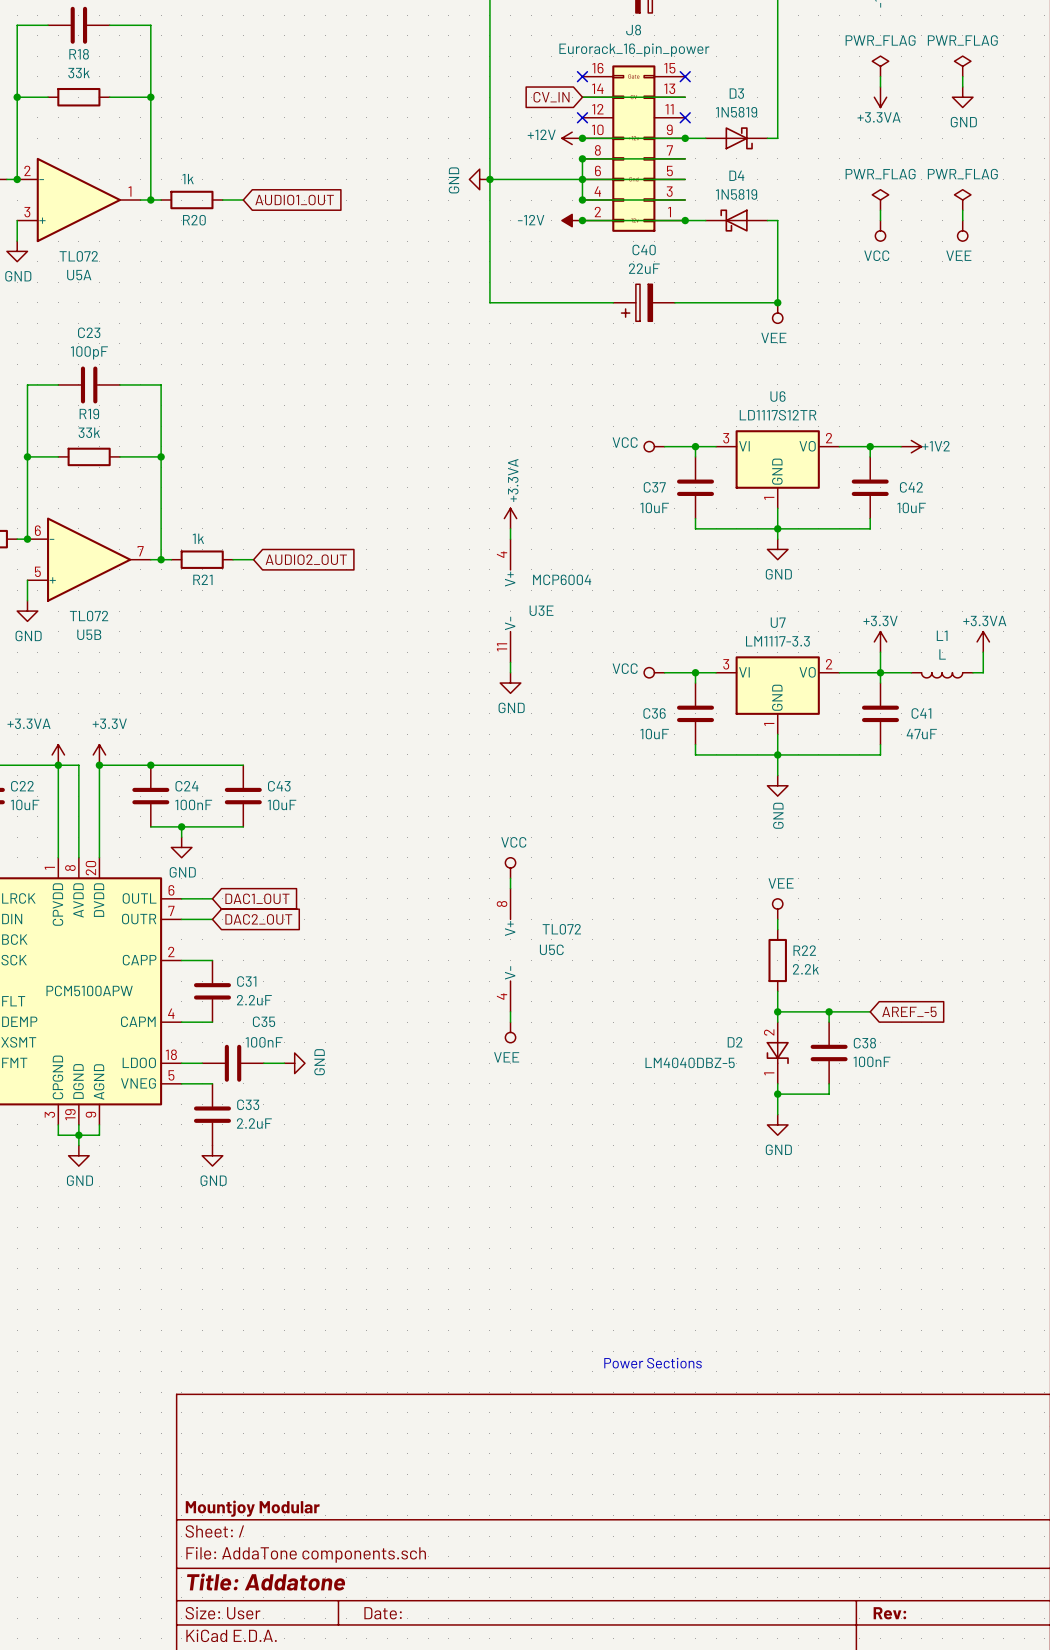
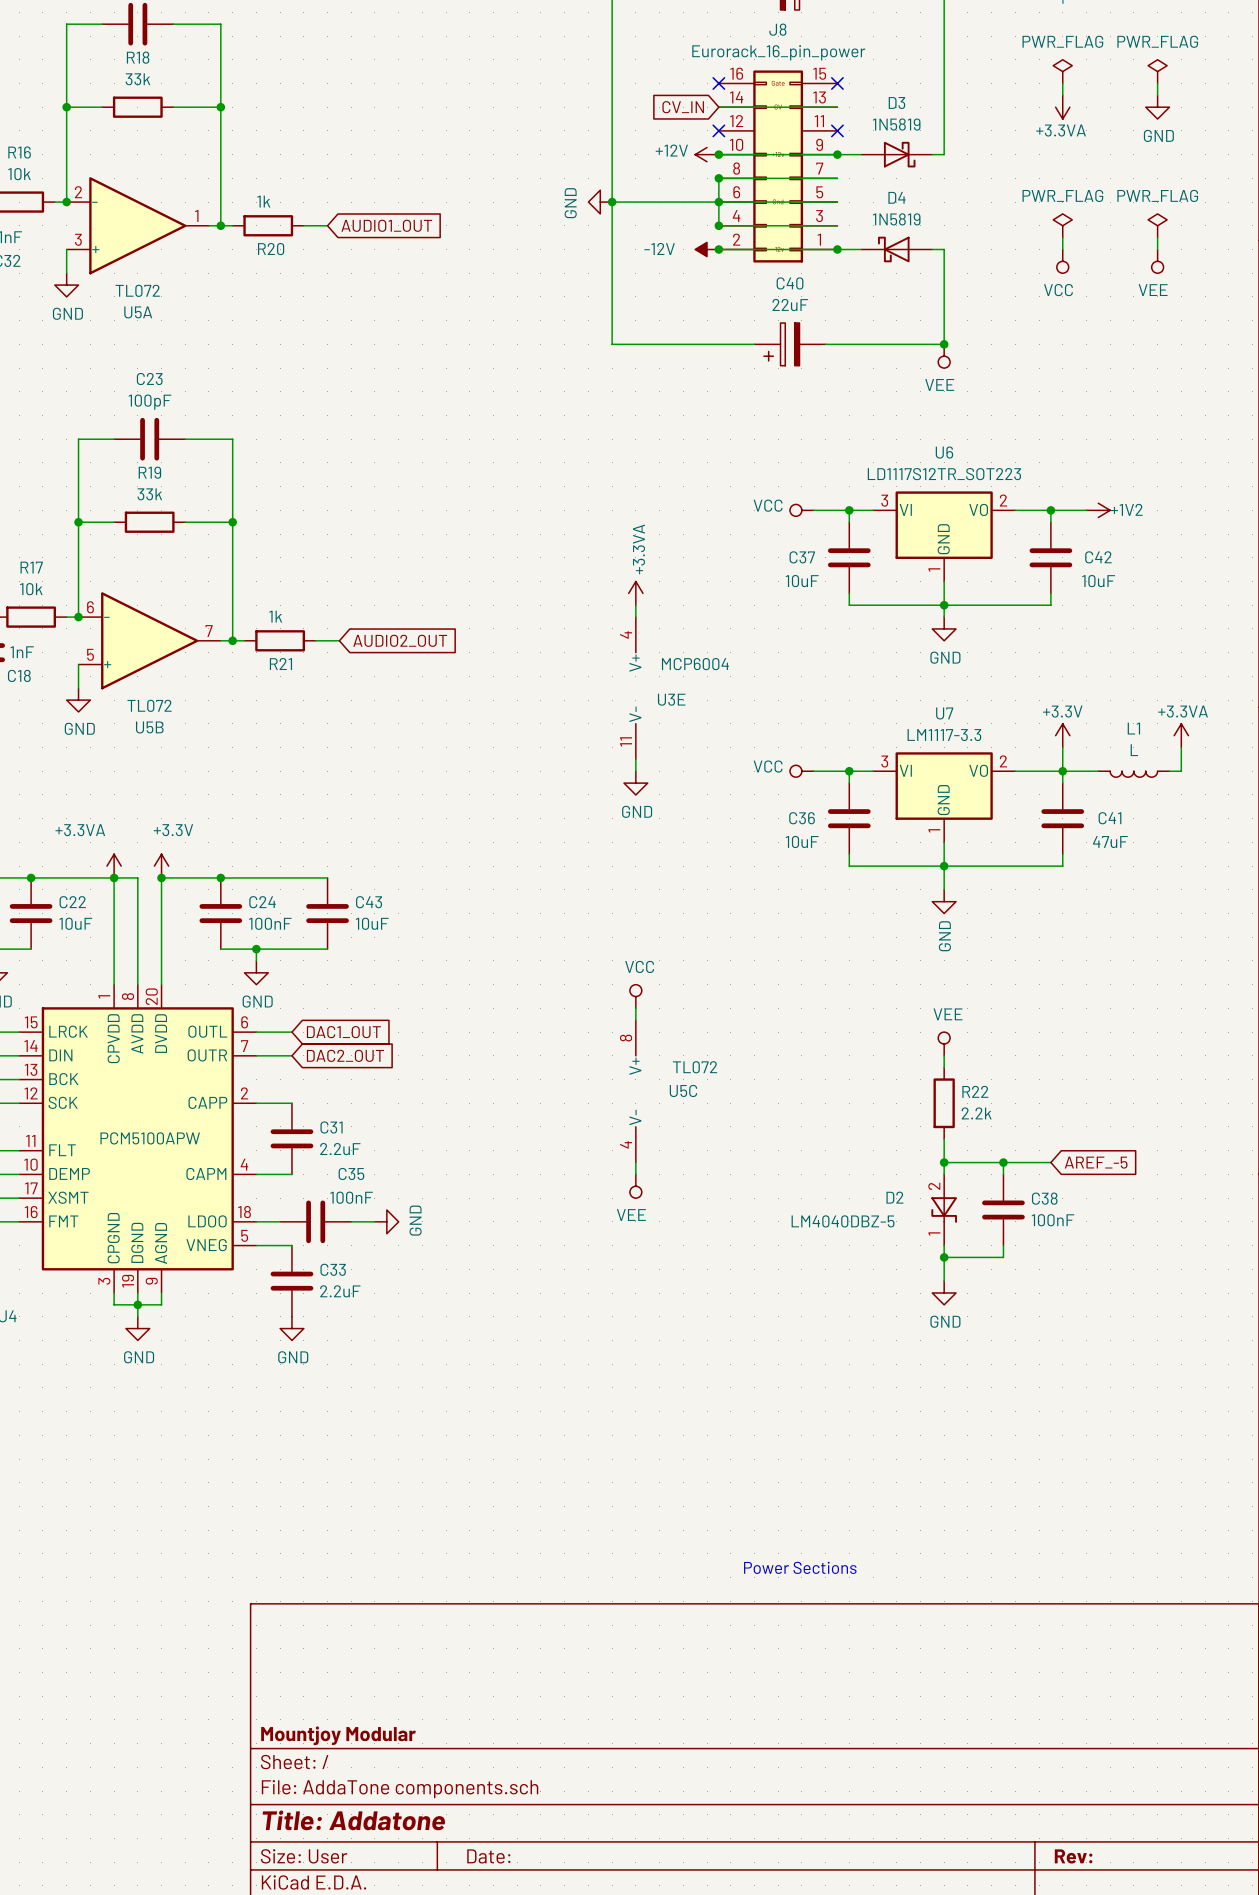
U6 value: LD1117S12TR (778, 415) -> LD1117S12TR_SOT223 (944, 474)

